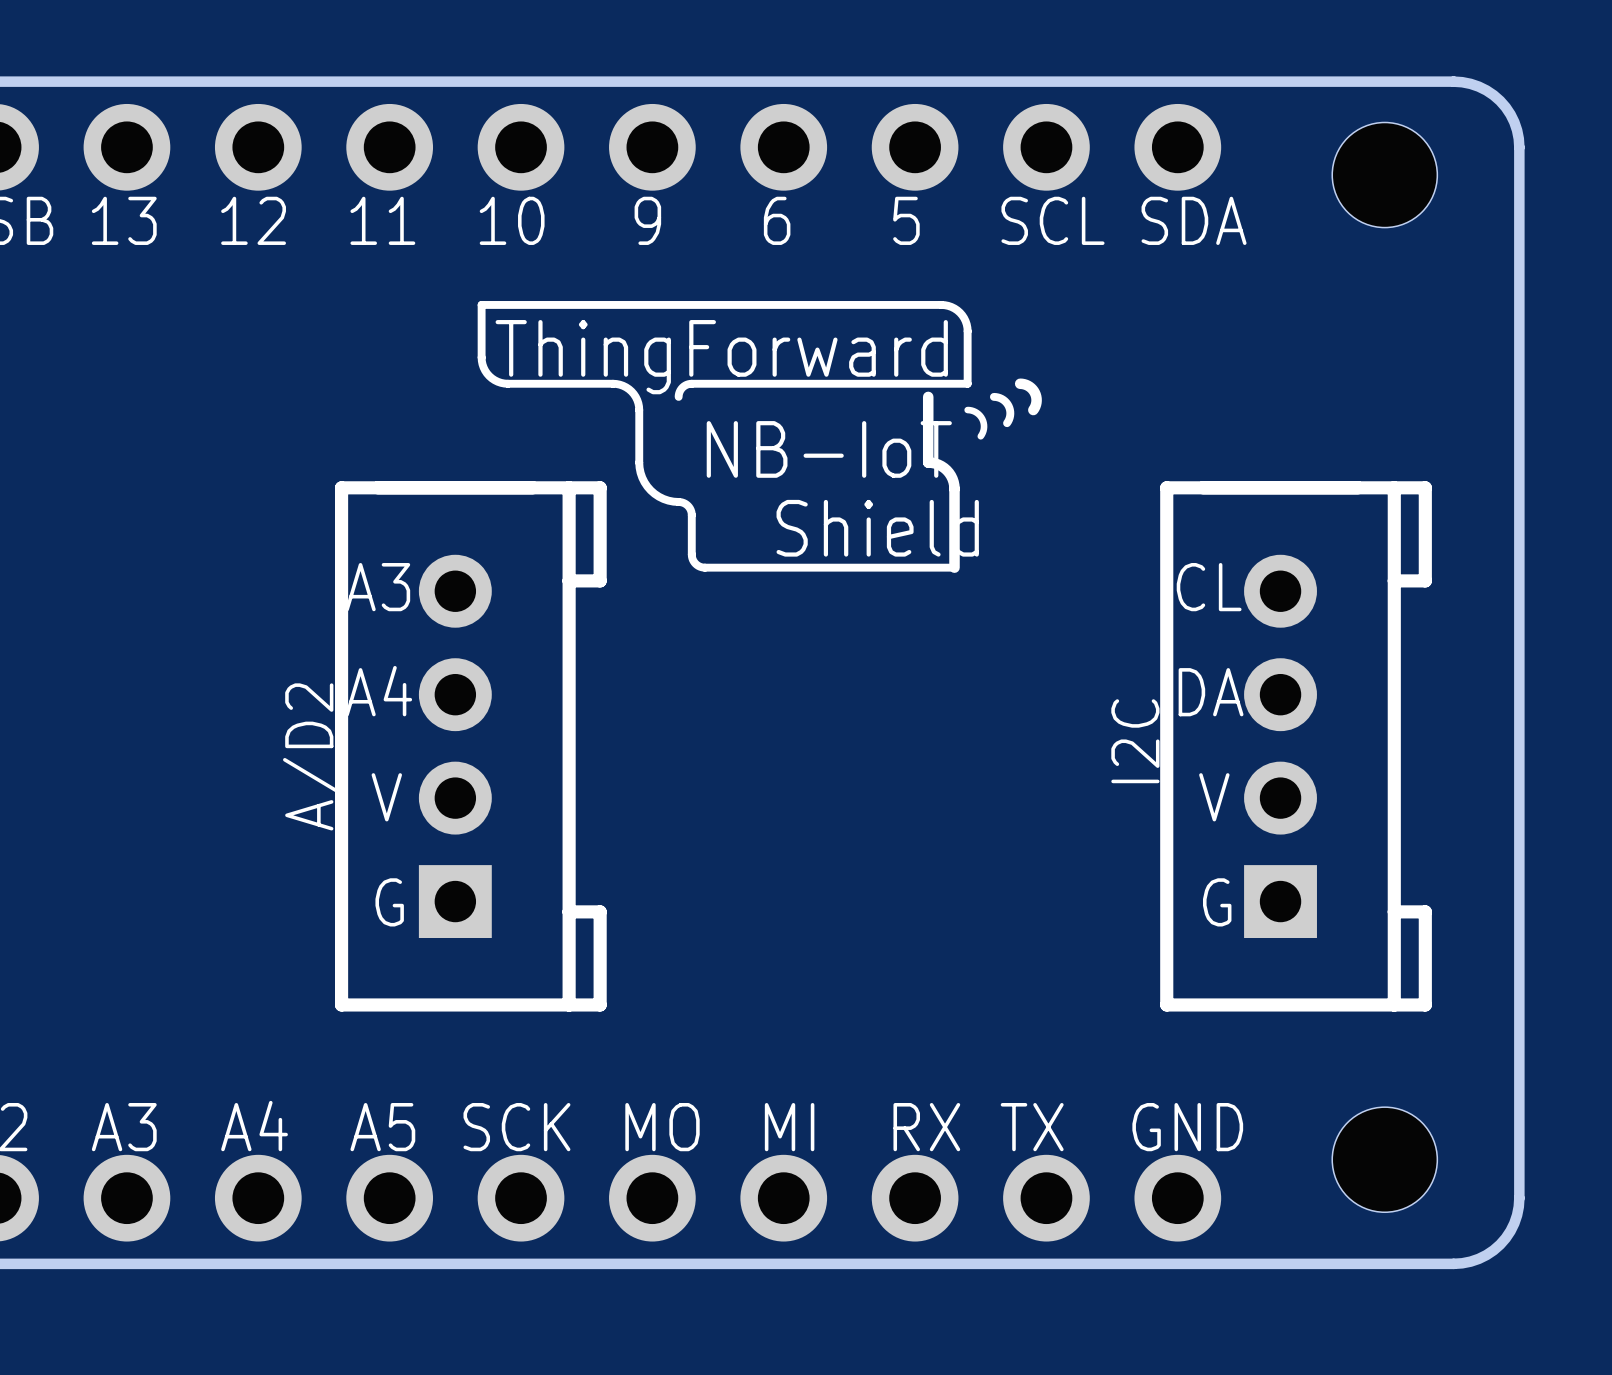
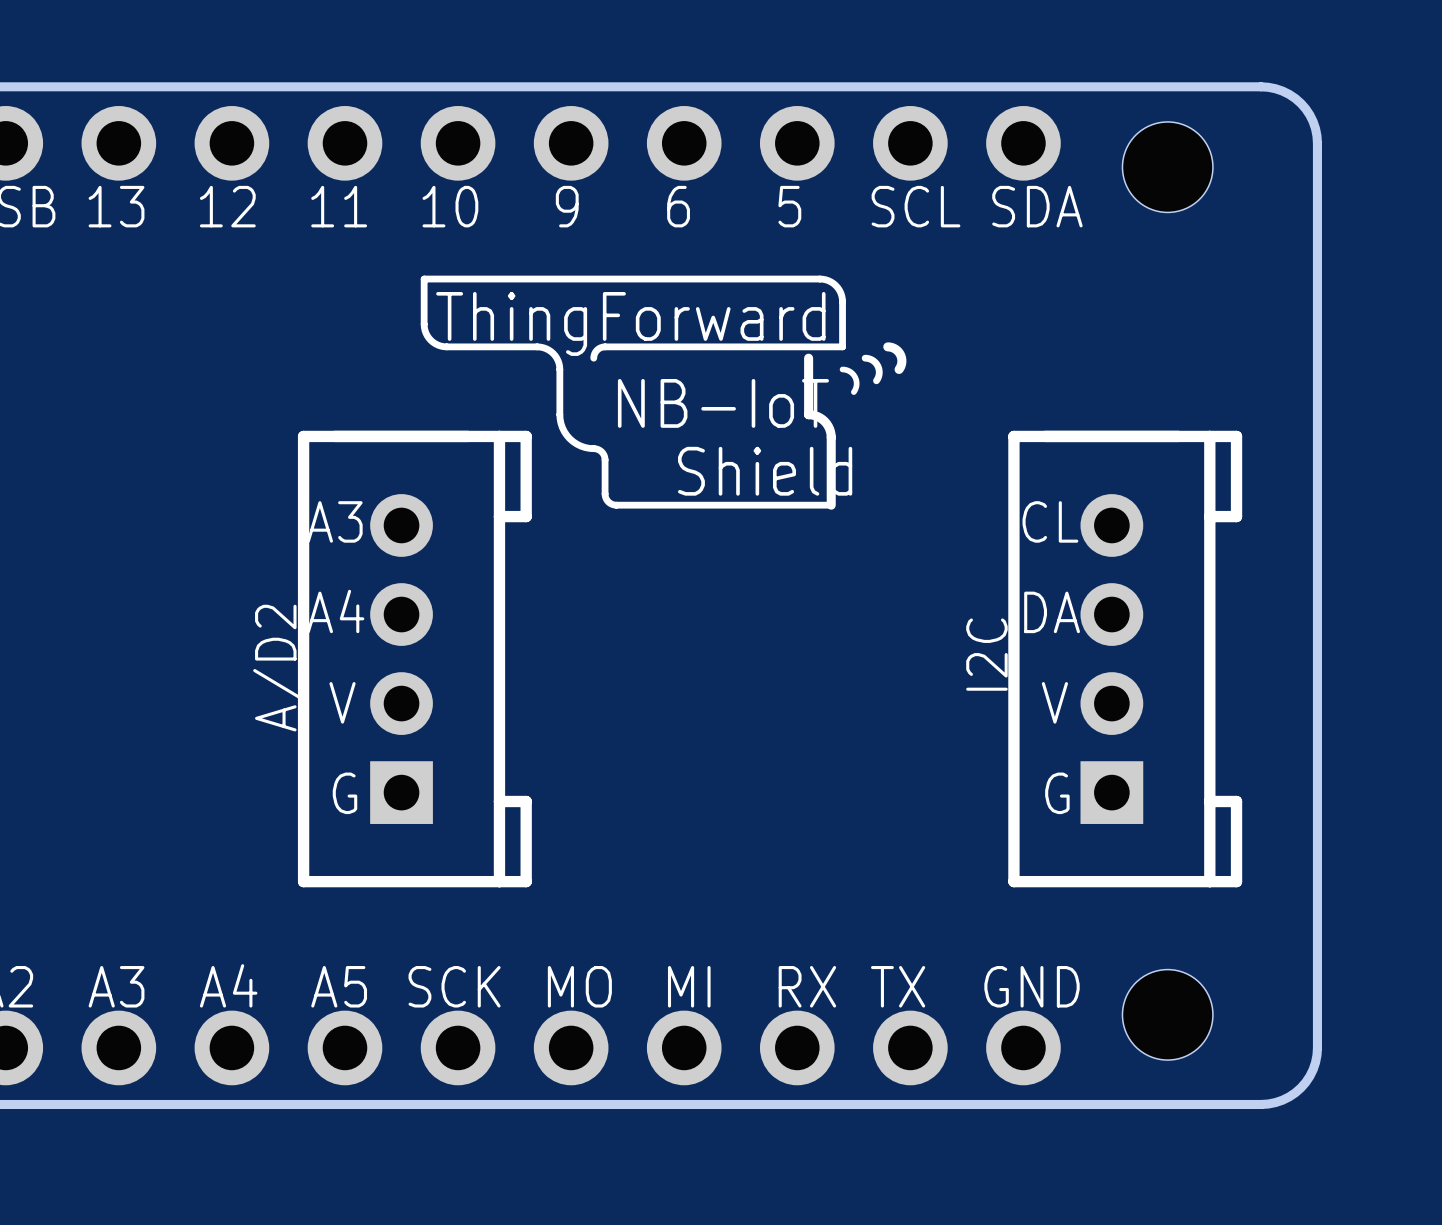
hole position: (1384, 175) -> (1167, 167)
hole position: (1384, 1159) -> (1167, 1014)

